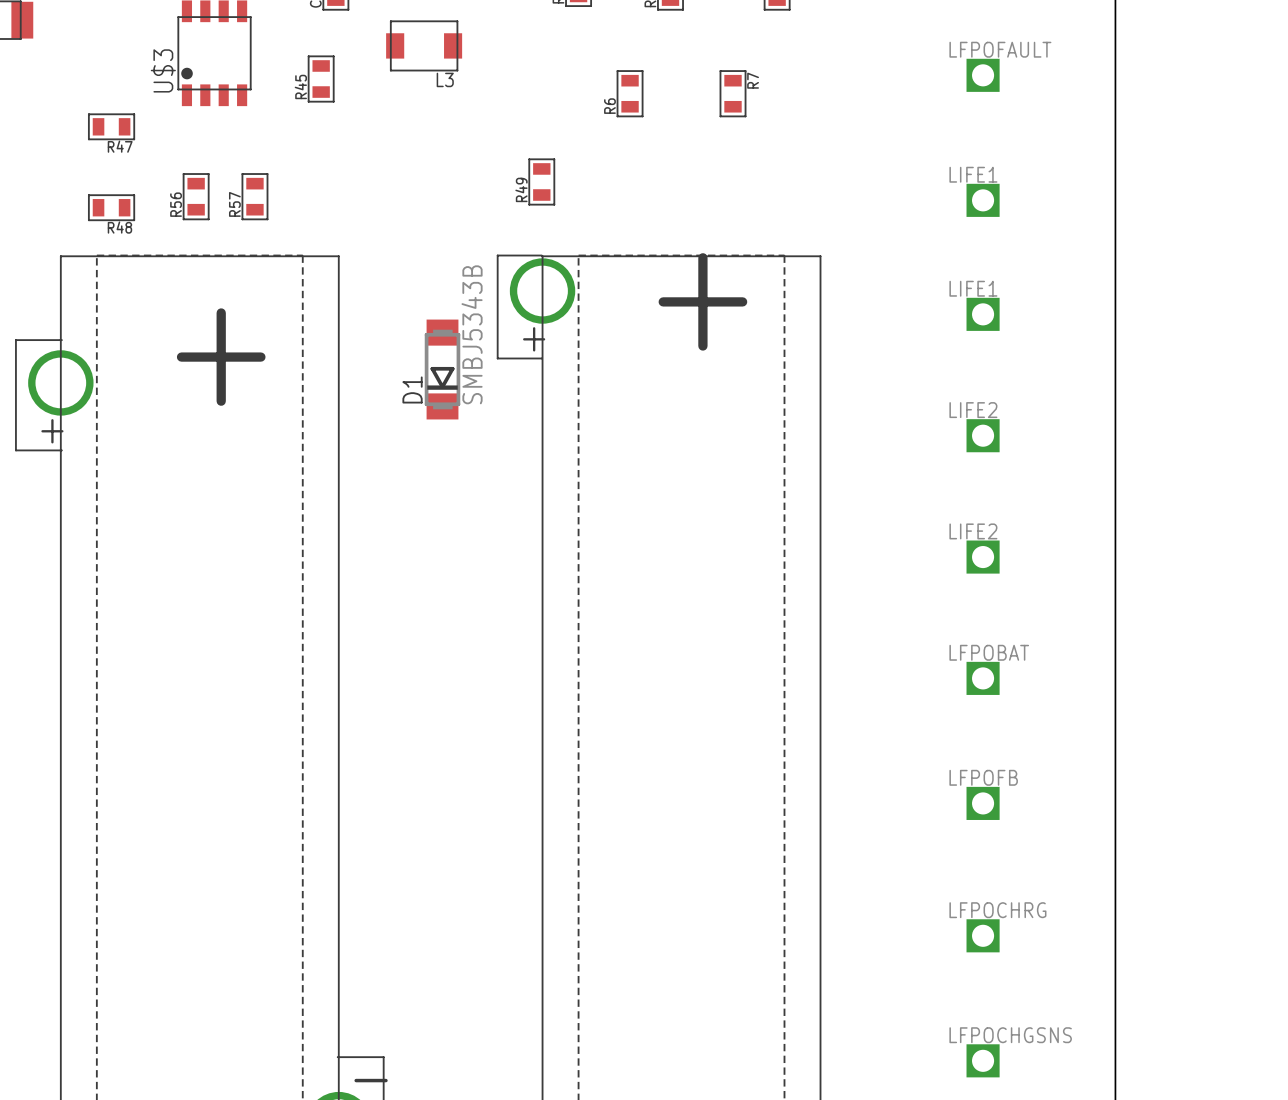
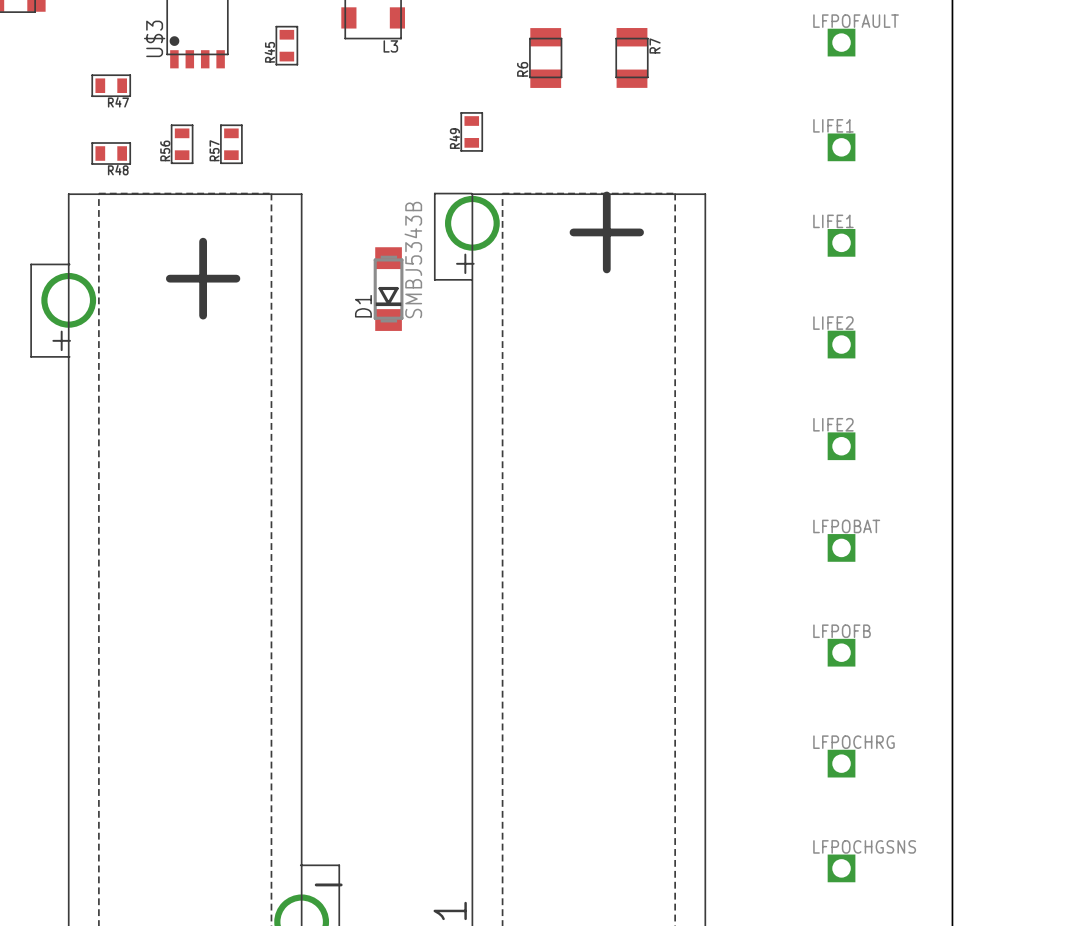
R6 footprint: [616, 70, 644, 118] -> [529, 28, 563, 88]
R7 footprint: [719, 70, 747, 118] -> [615, 28, 649, 88]

